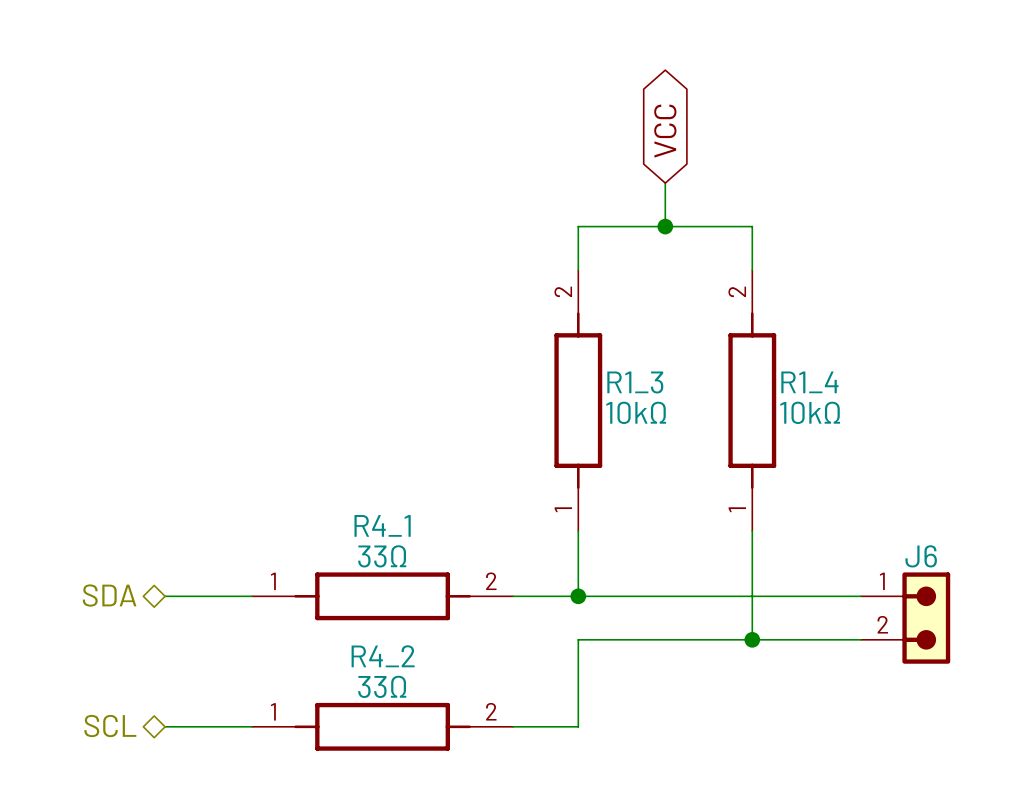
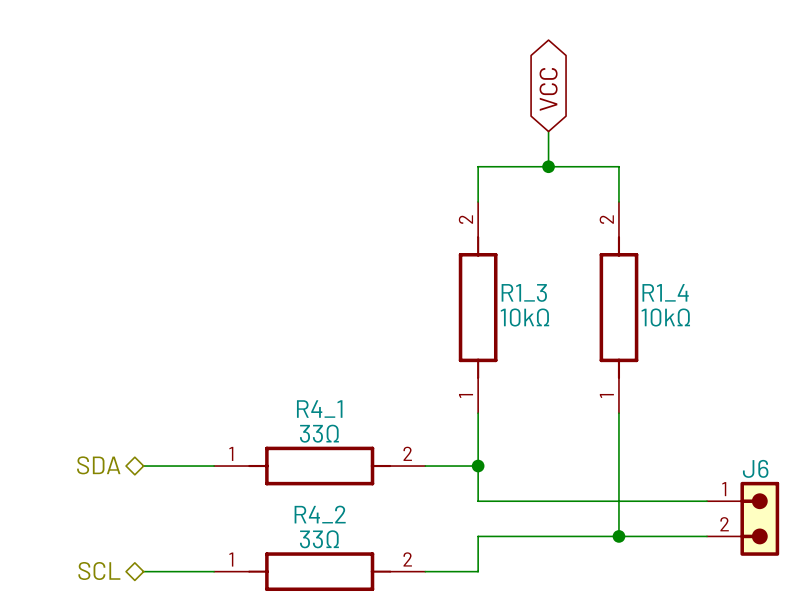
wire: (578, 596) (861, 596) -> (478, 536) (706, 536)
J6 position: (905, 618) -> (743, 518)
wire: (578, 639) (578, 683) -> (478, 501) (478, 466)
wire: none -> (618, 501) (618, 536)
junction position: (752, 639) -> (618, 536)

